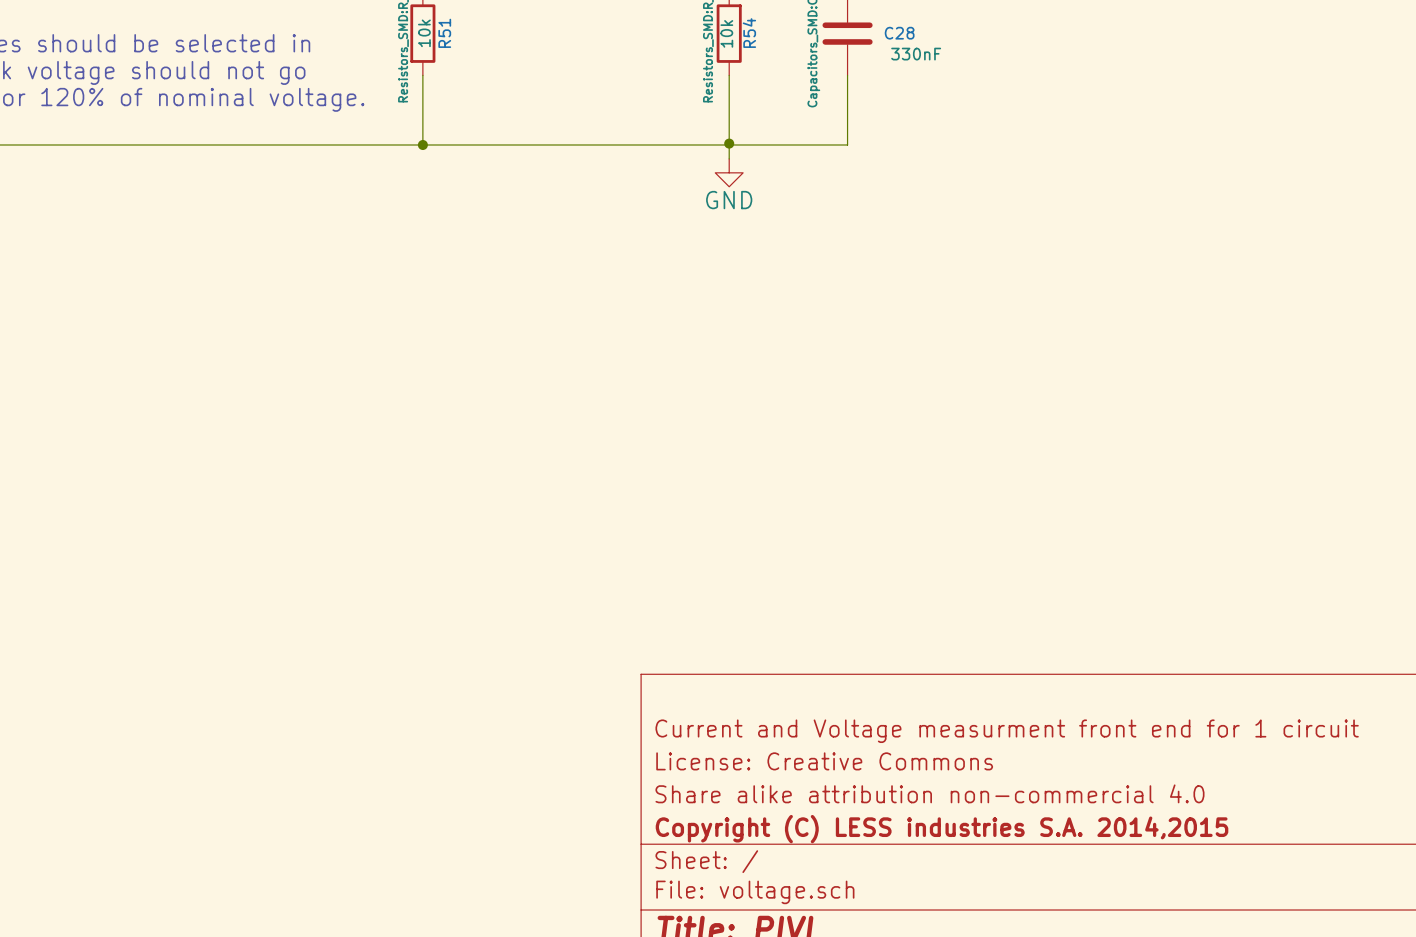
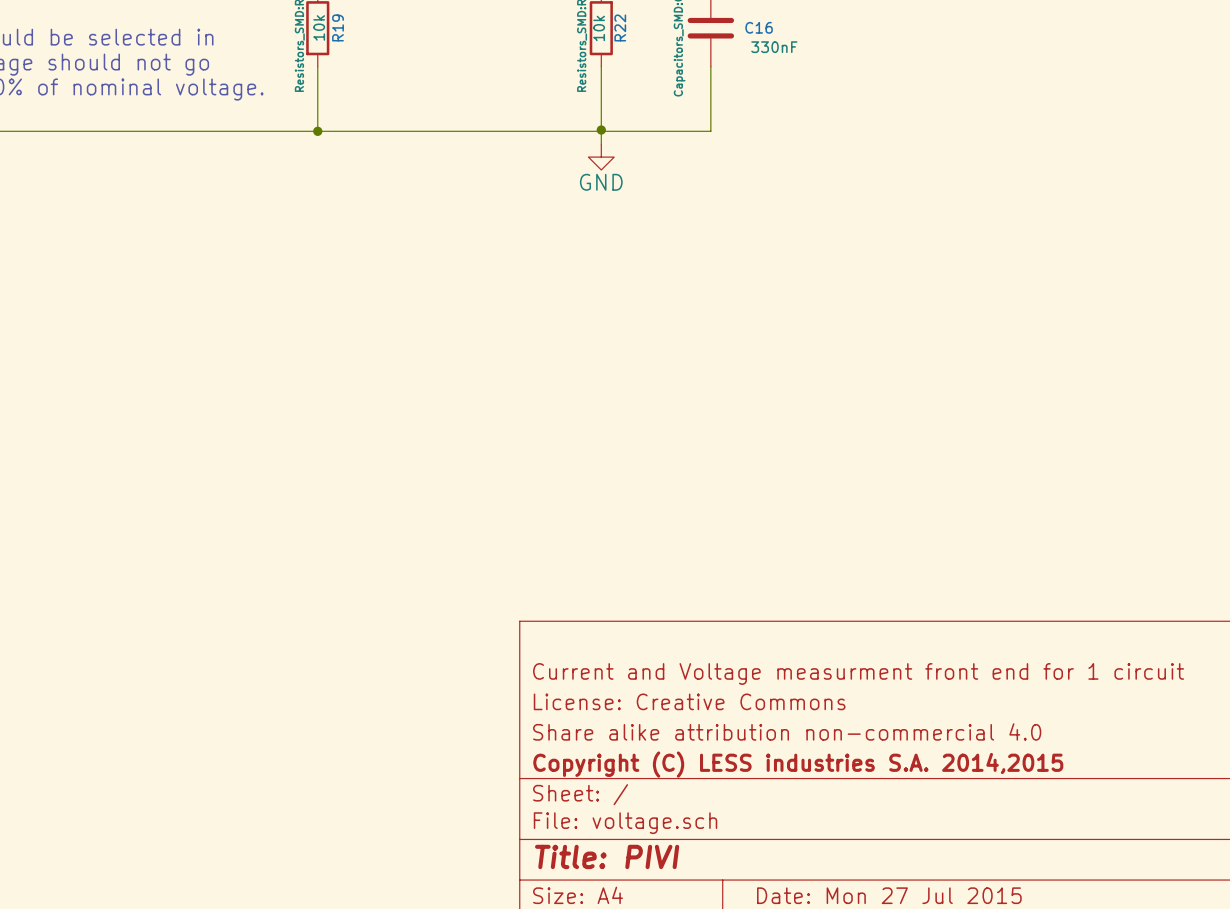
R51 name: R51 (444, 33) -> R19 (338, 27)
R54 name: R54 (749, 33) -> R22 (620, 27)
C28 name: C28 (899, 33) -> C16 (759, 27)

